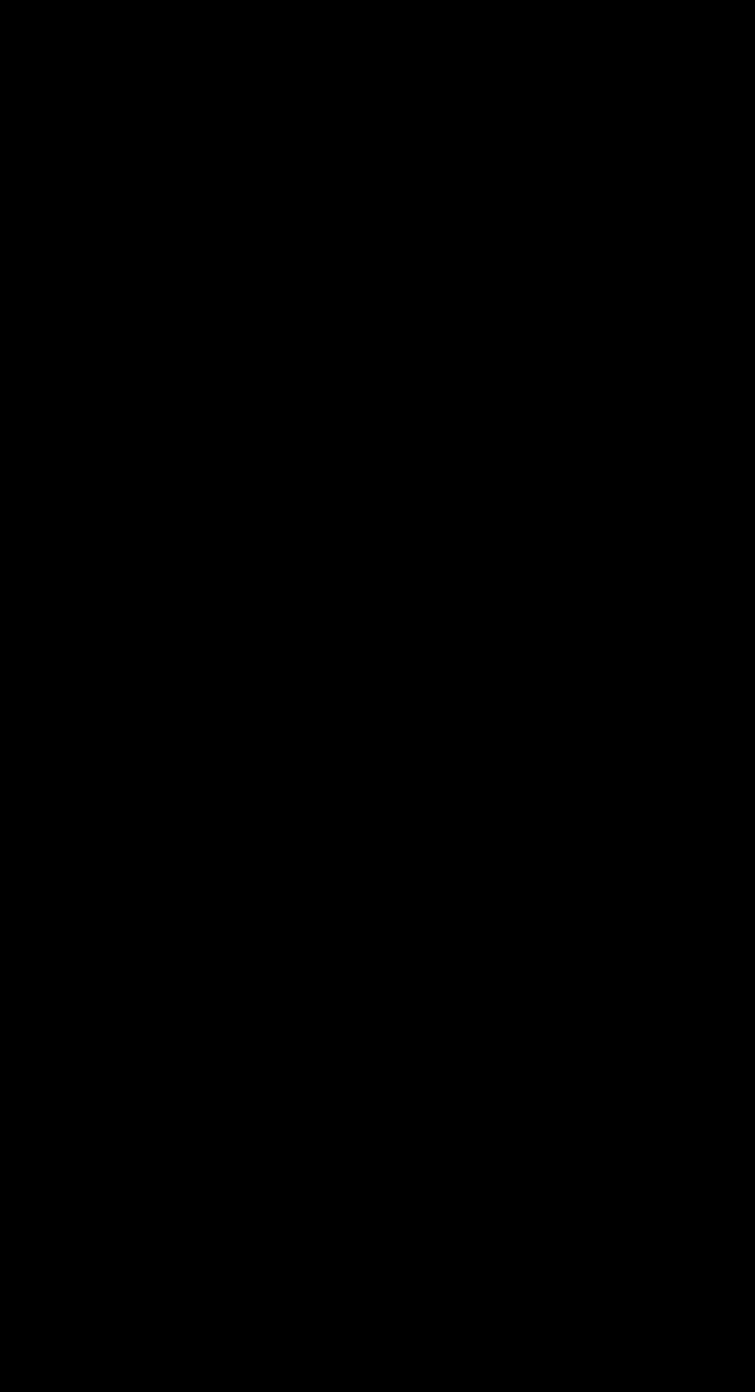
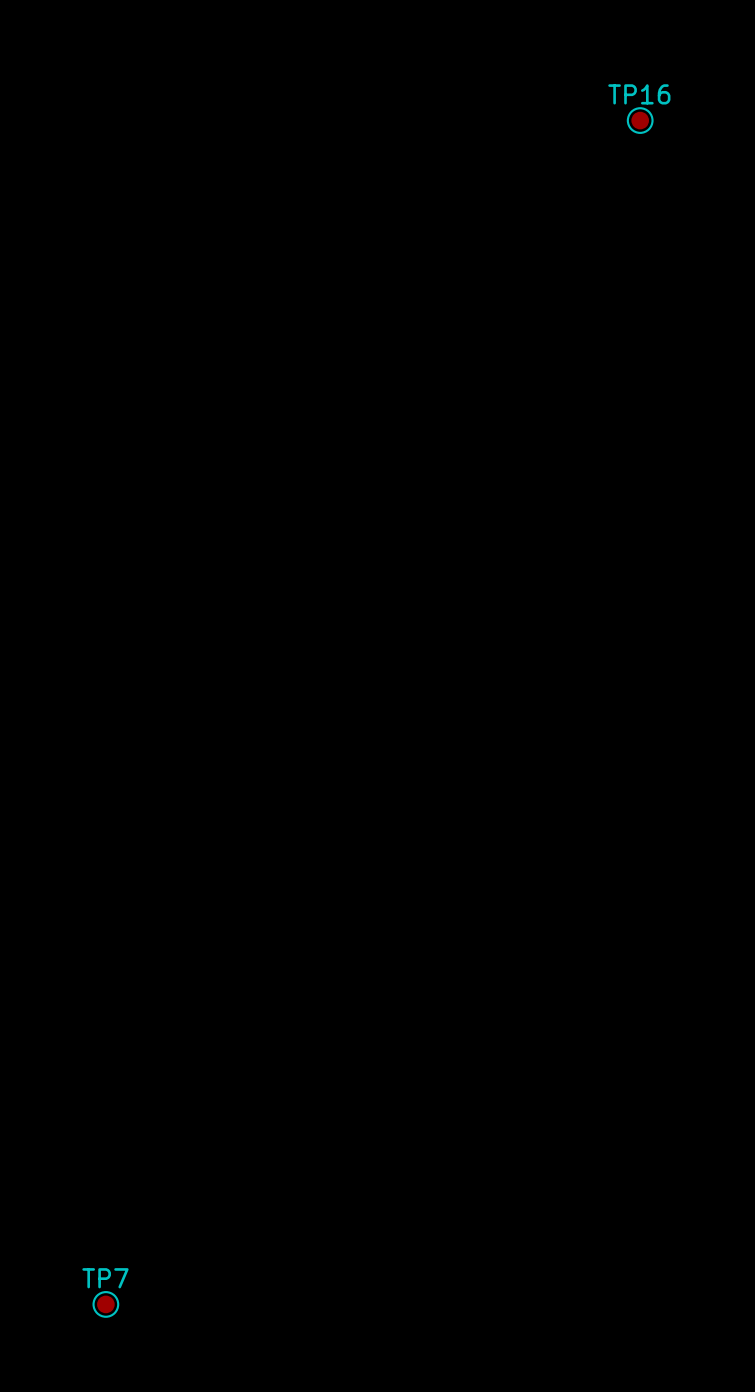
TP16: none -> (640, 120)
TP7: none -> (105, 1304)

